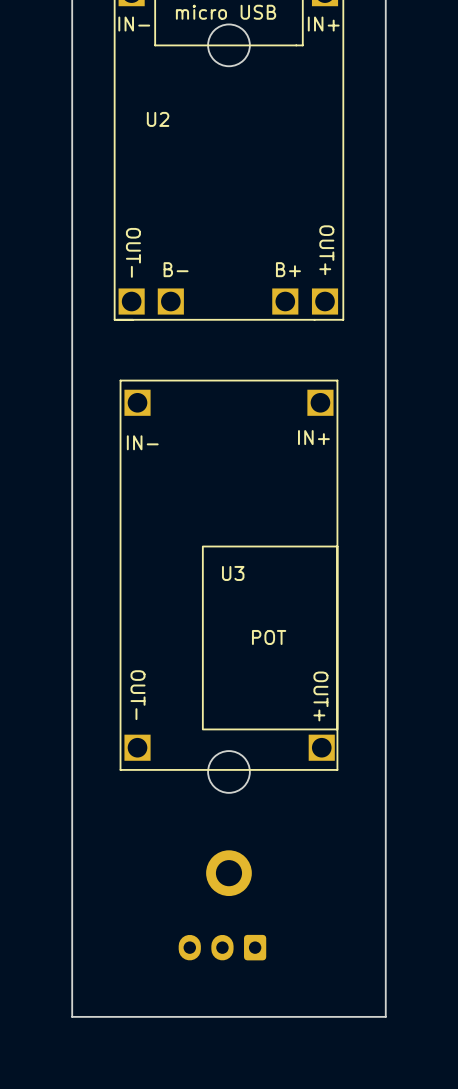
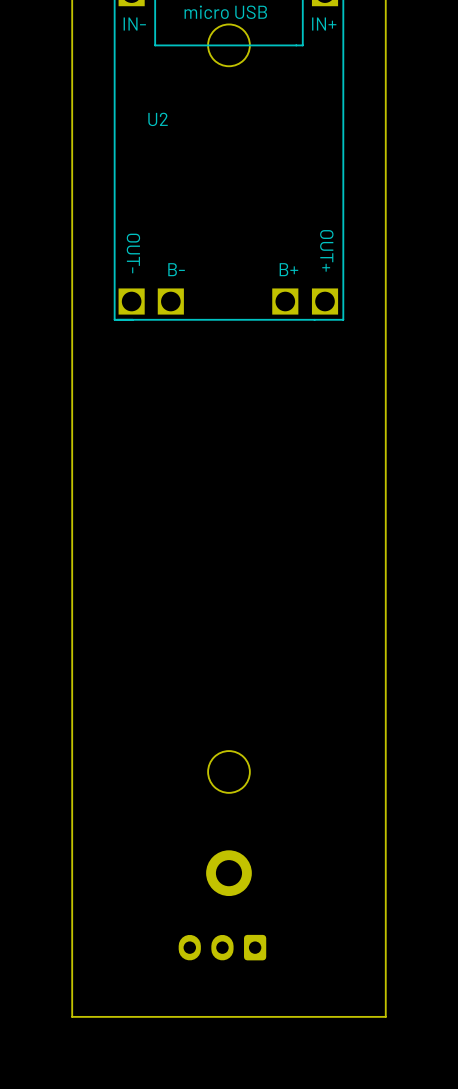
U3: (228, 575) -> none

